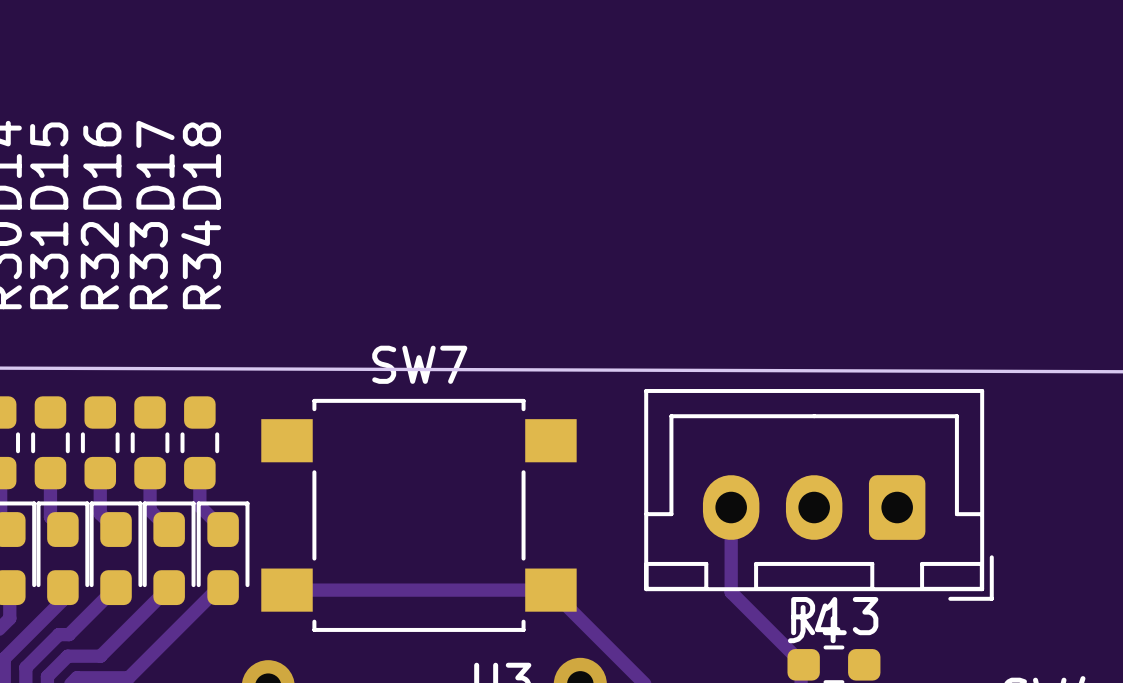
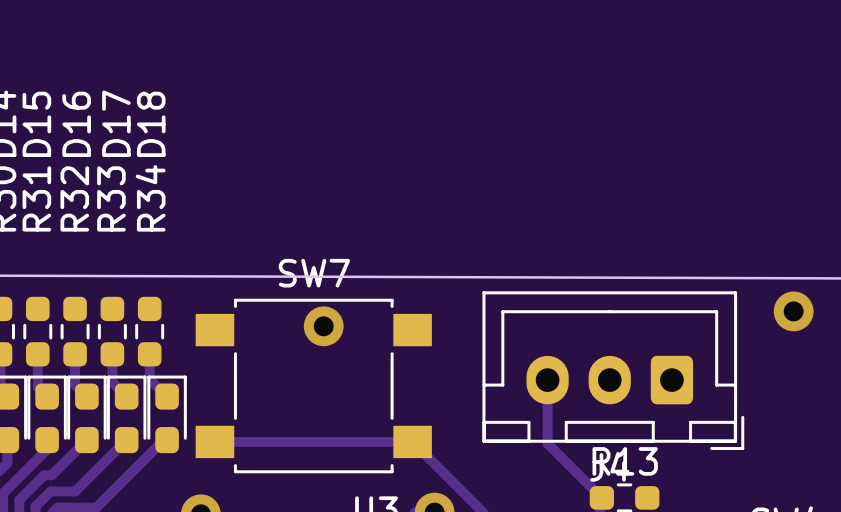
via: none -> (793, 311)
via: none -> (323, 326)

